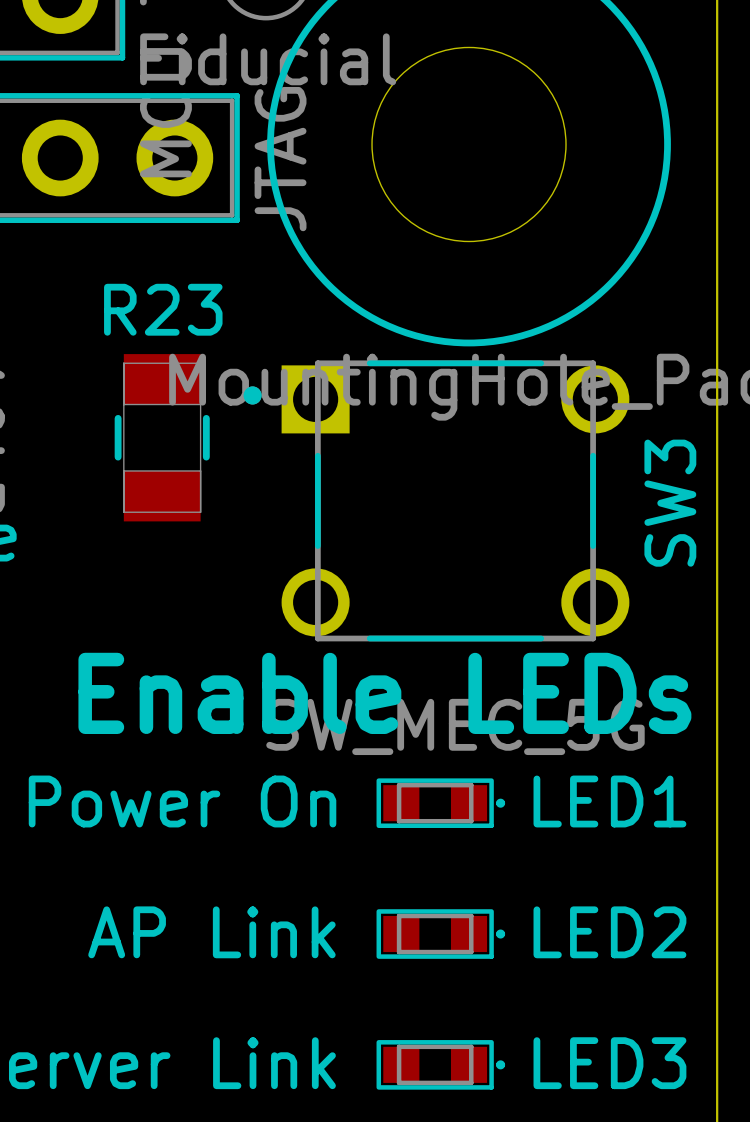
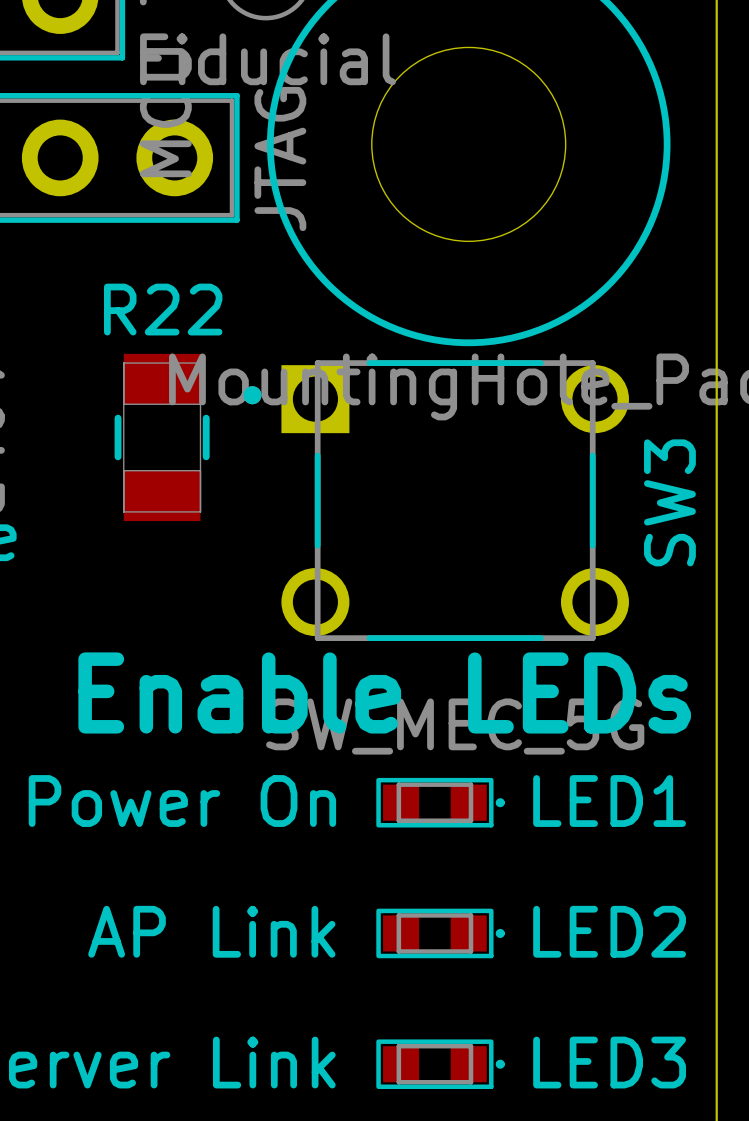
R23 name: R23 (163, 309) -> R22 (163, 309)

